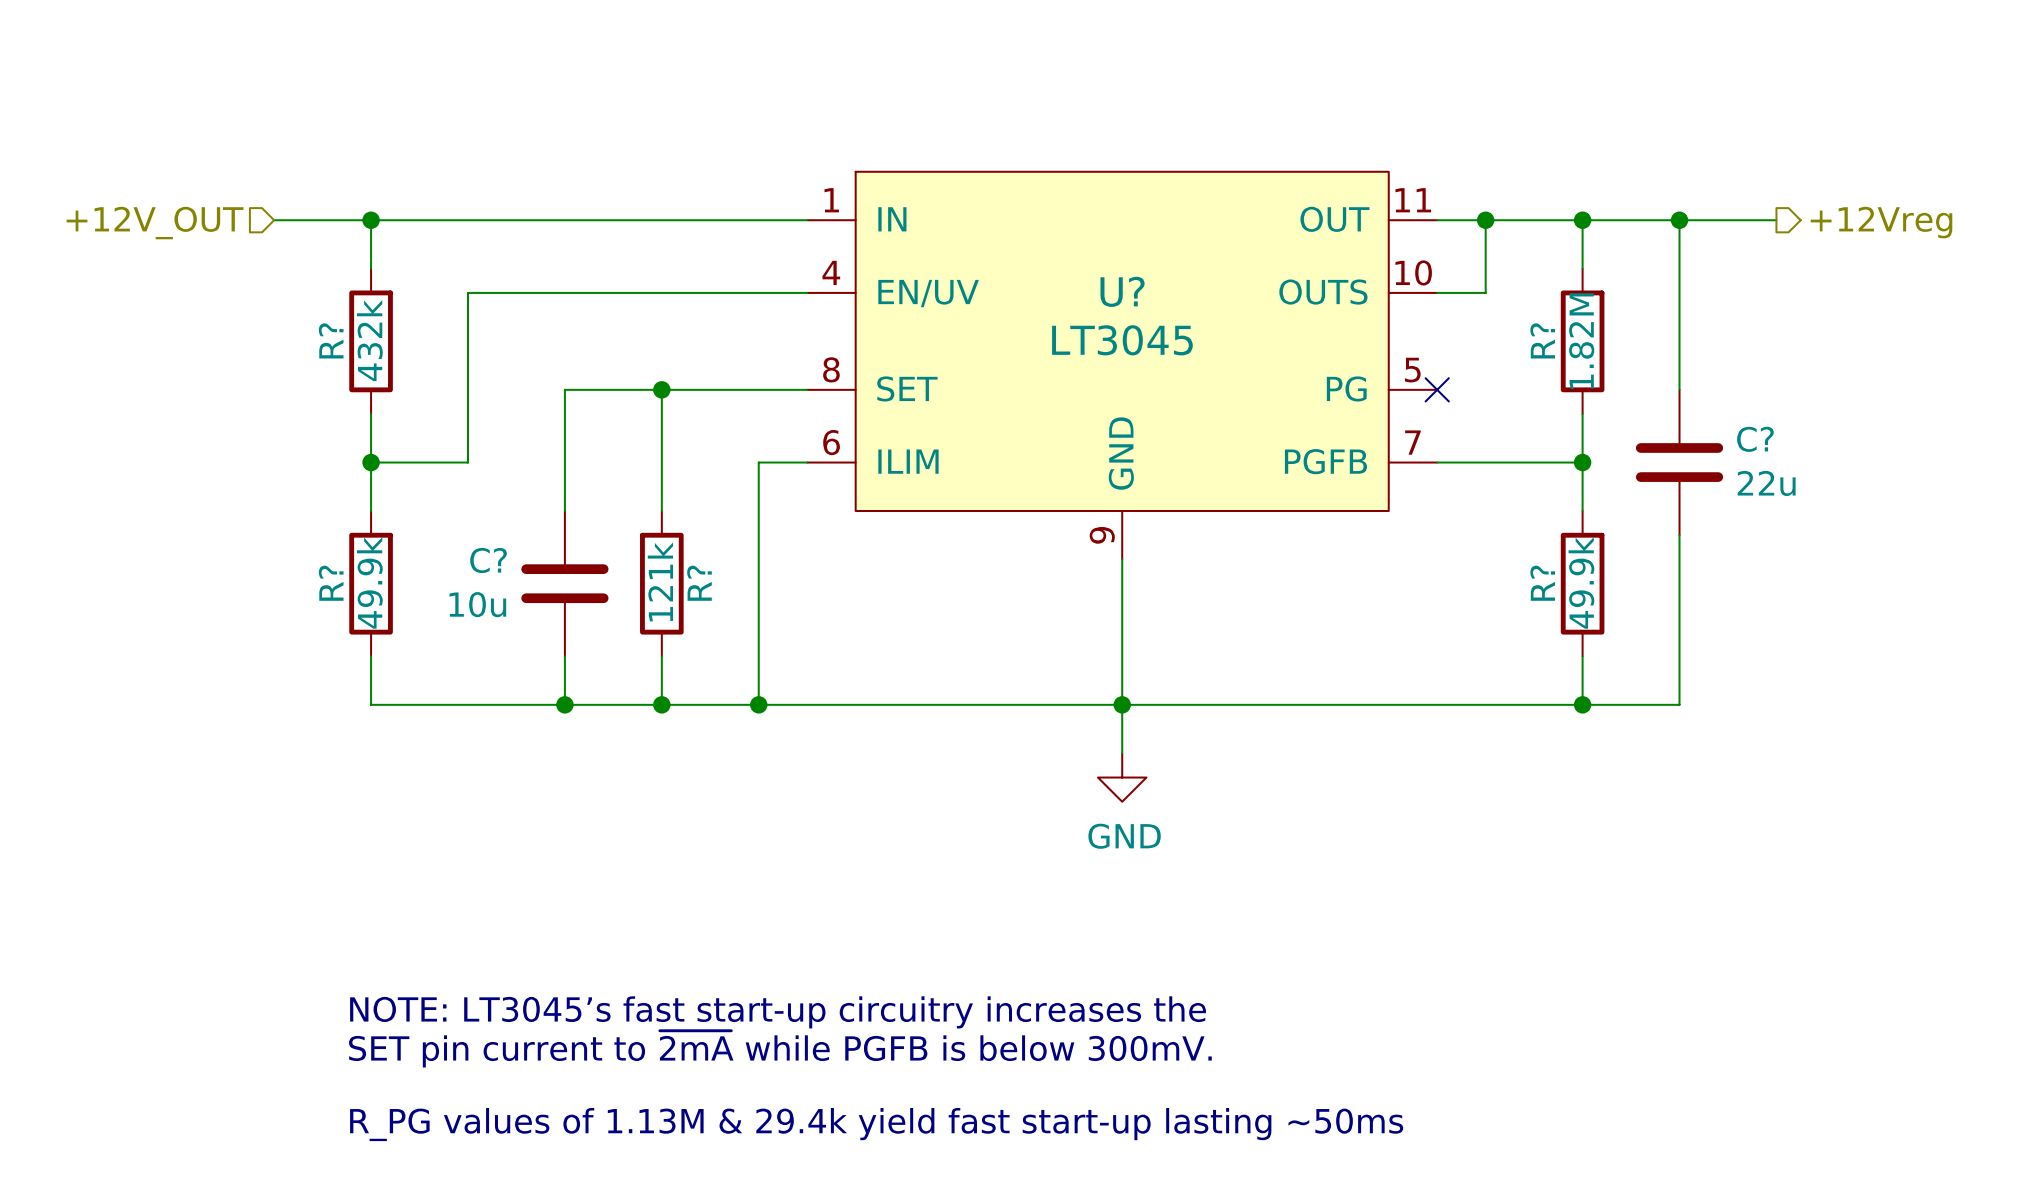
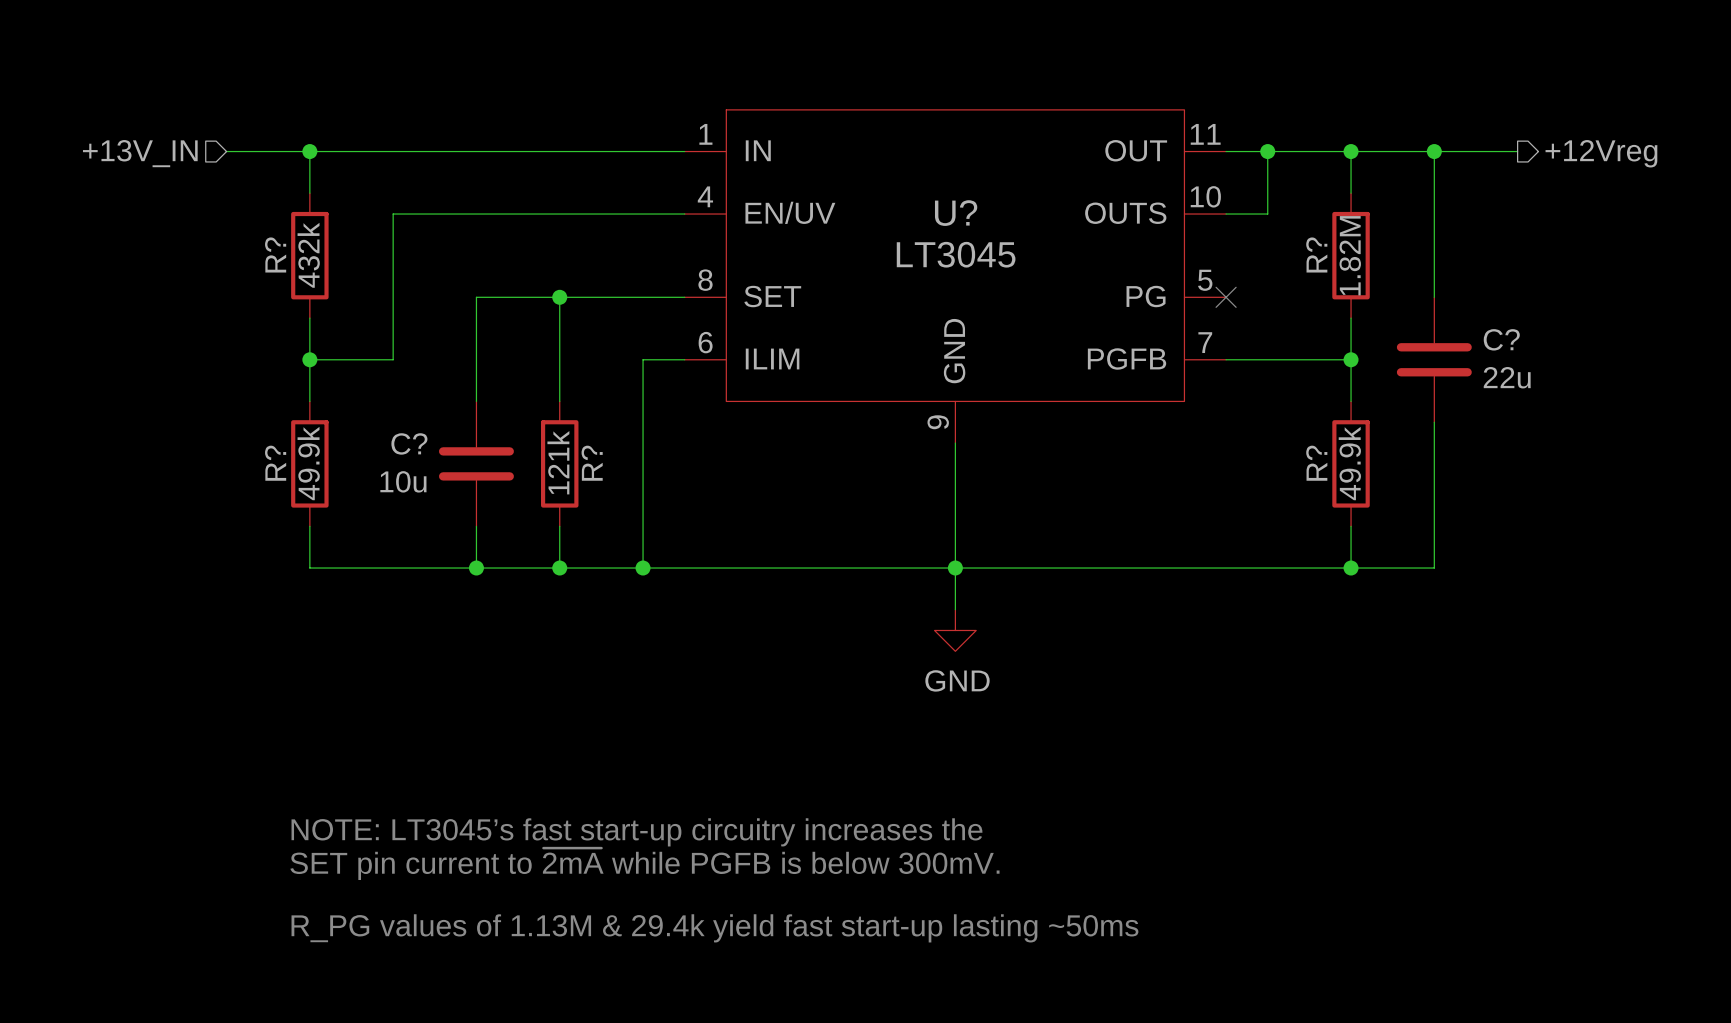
hierarchical label: +12V_OUT (155, 223) -> +13V_IN (140, 153)

